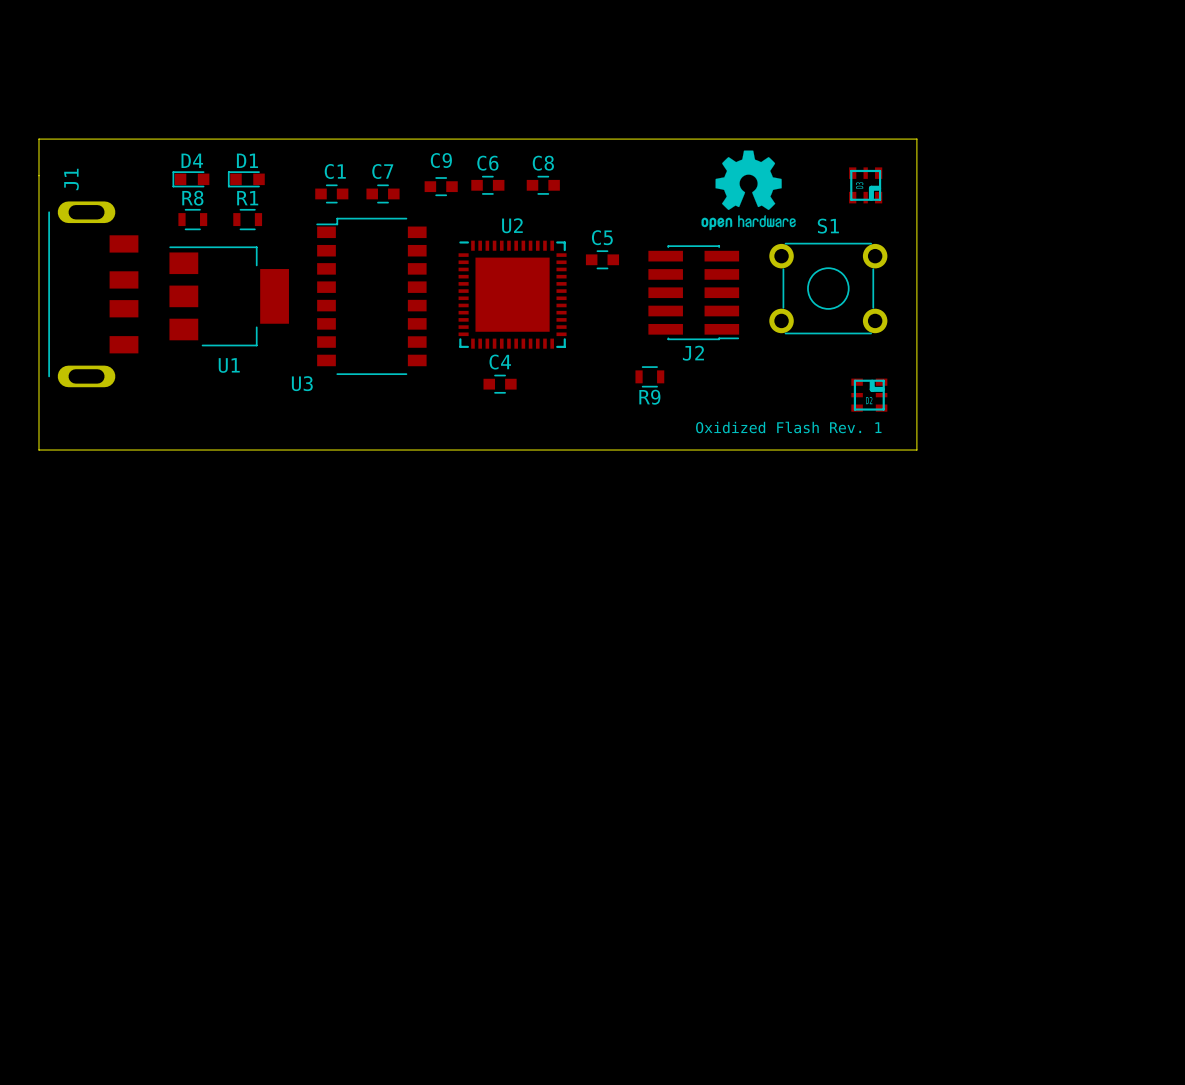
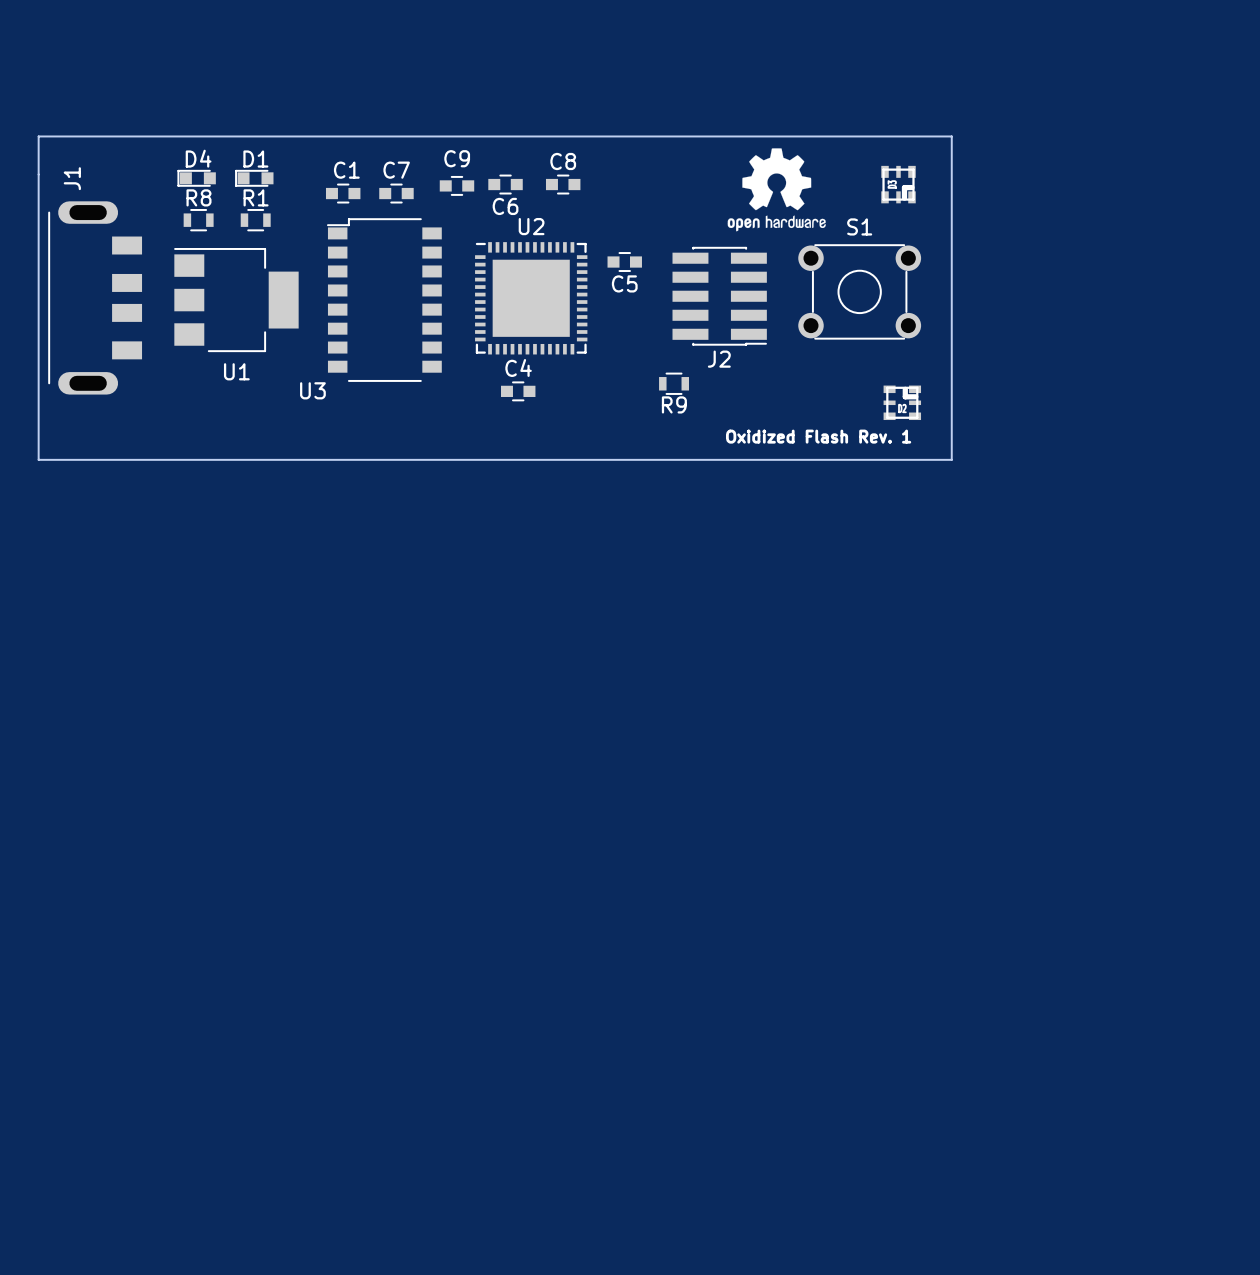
C6 name position: C6 (487, 163) -> C6 (505, 206)
C5 name position: C5 (602, 237) -> C5 (624, 283)

